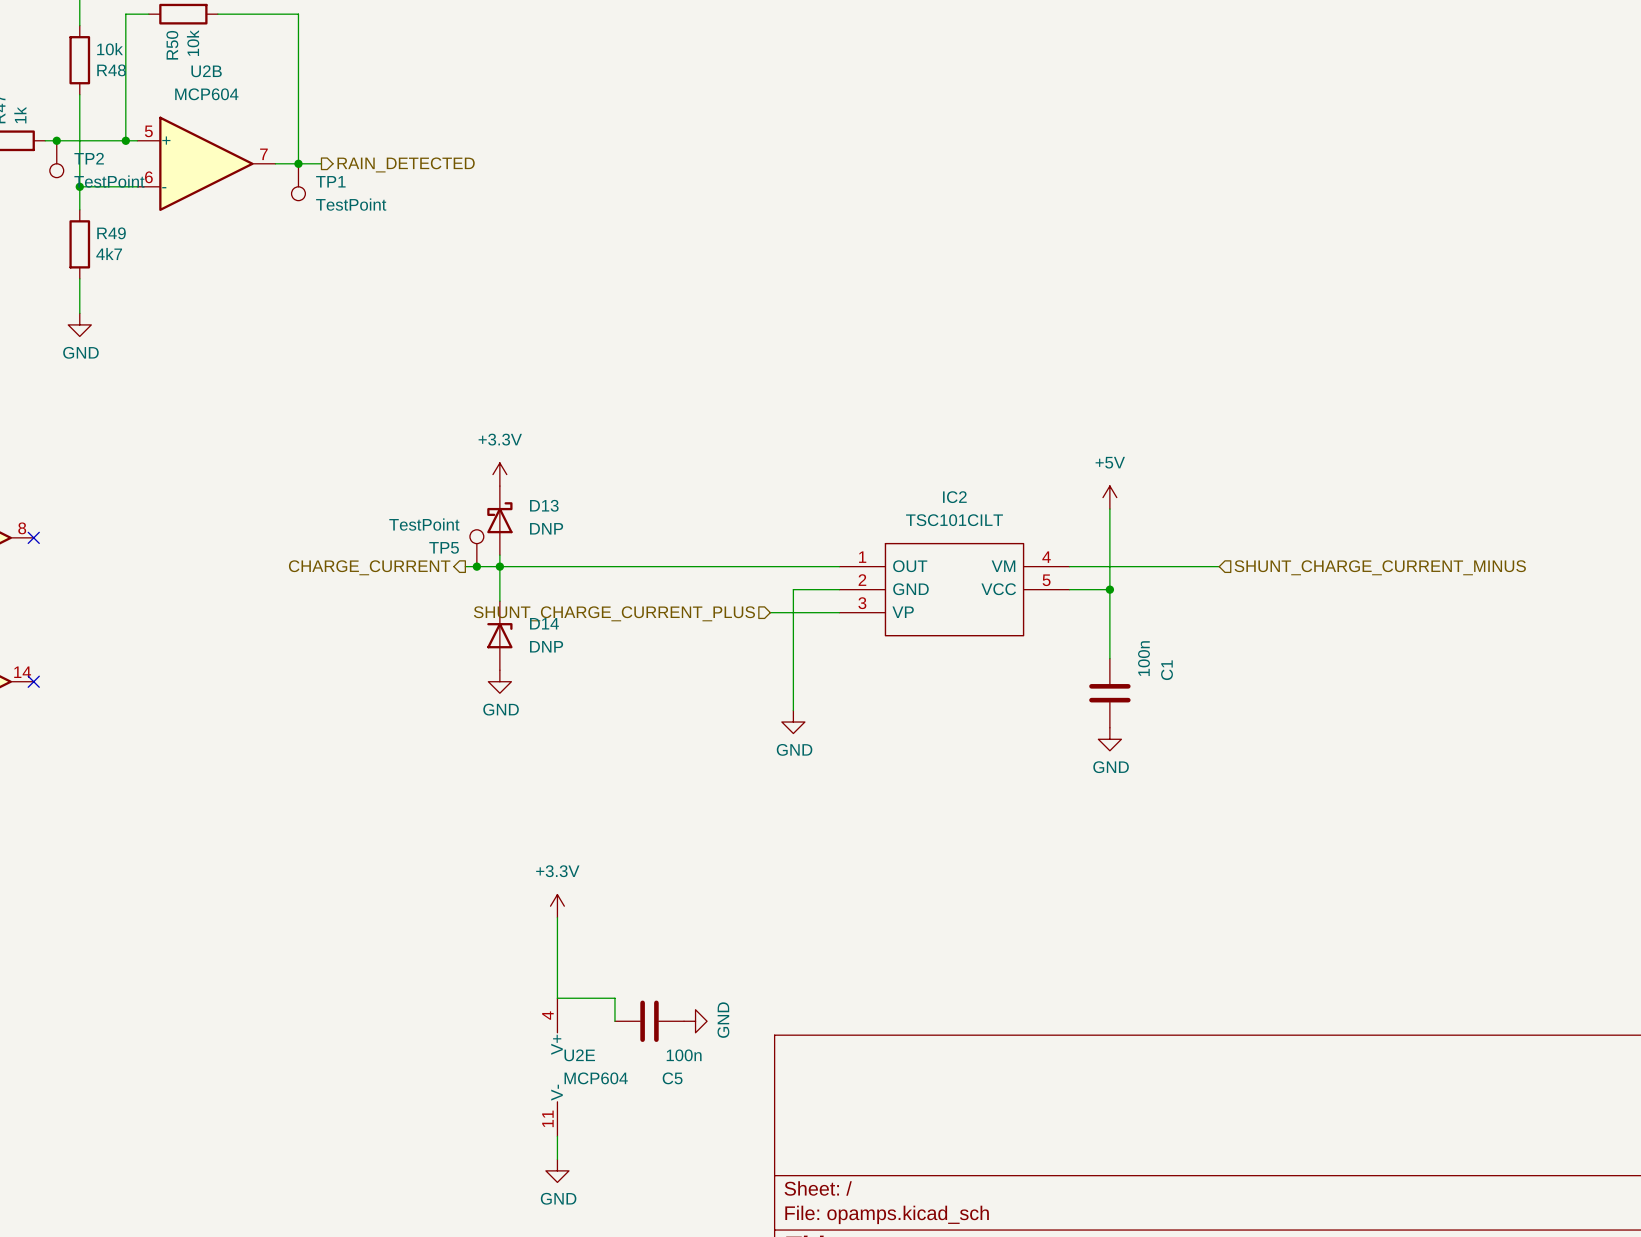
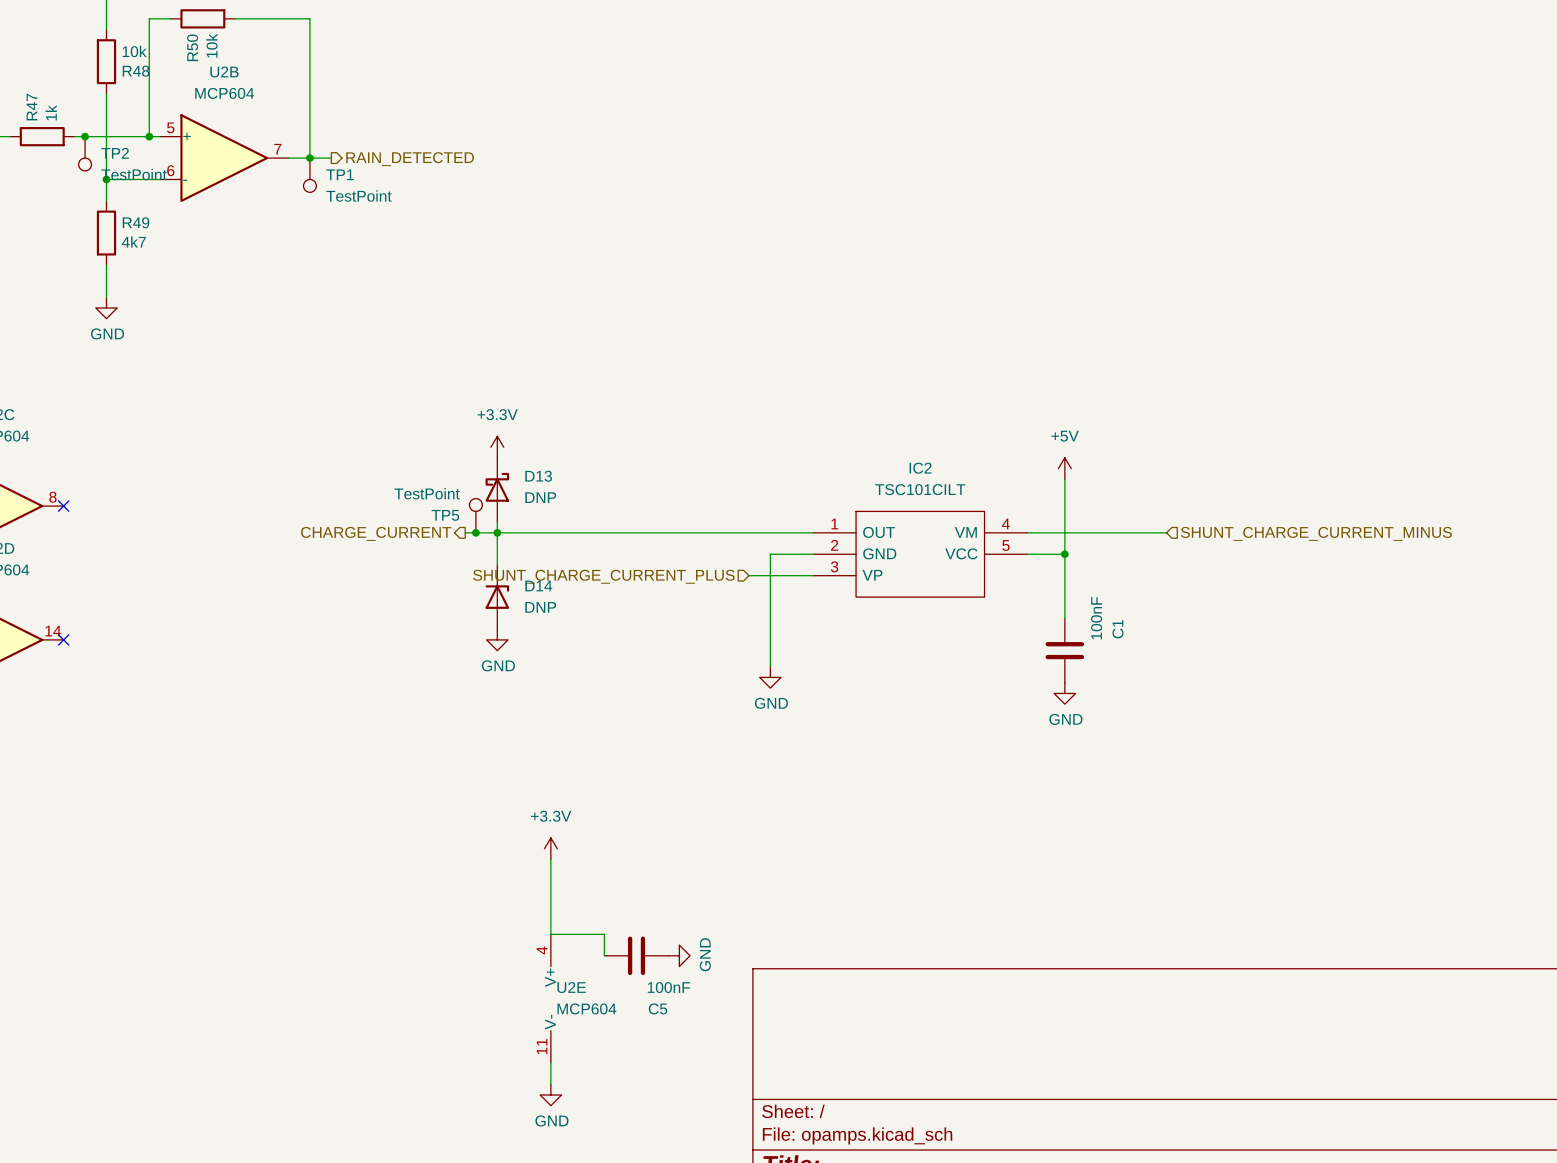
C1 value: 100n (1143, 658) -> 100nF (1096, 618)
C5 value: 100n (684, 1055) -> 100nF (668, 987)

